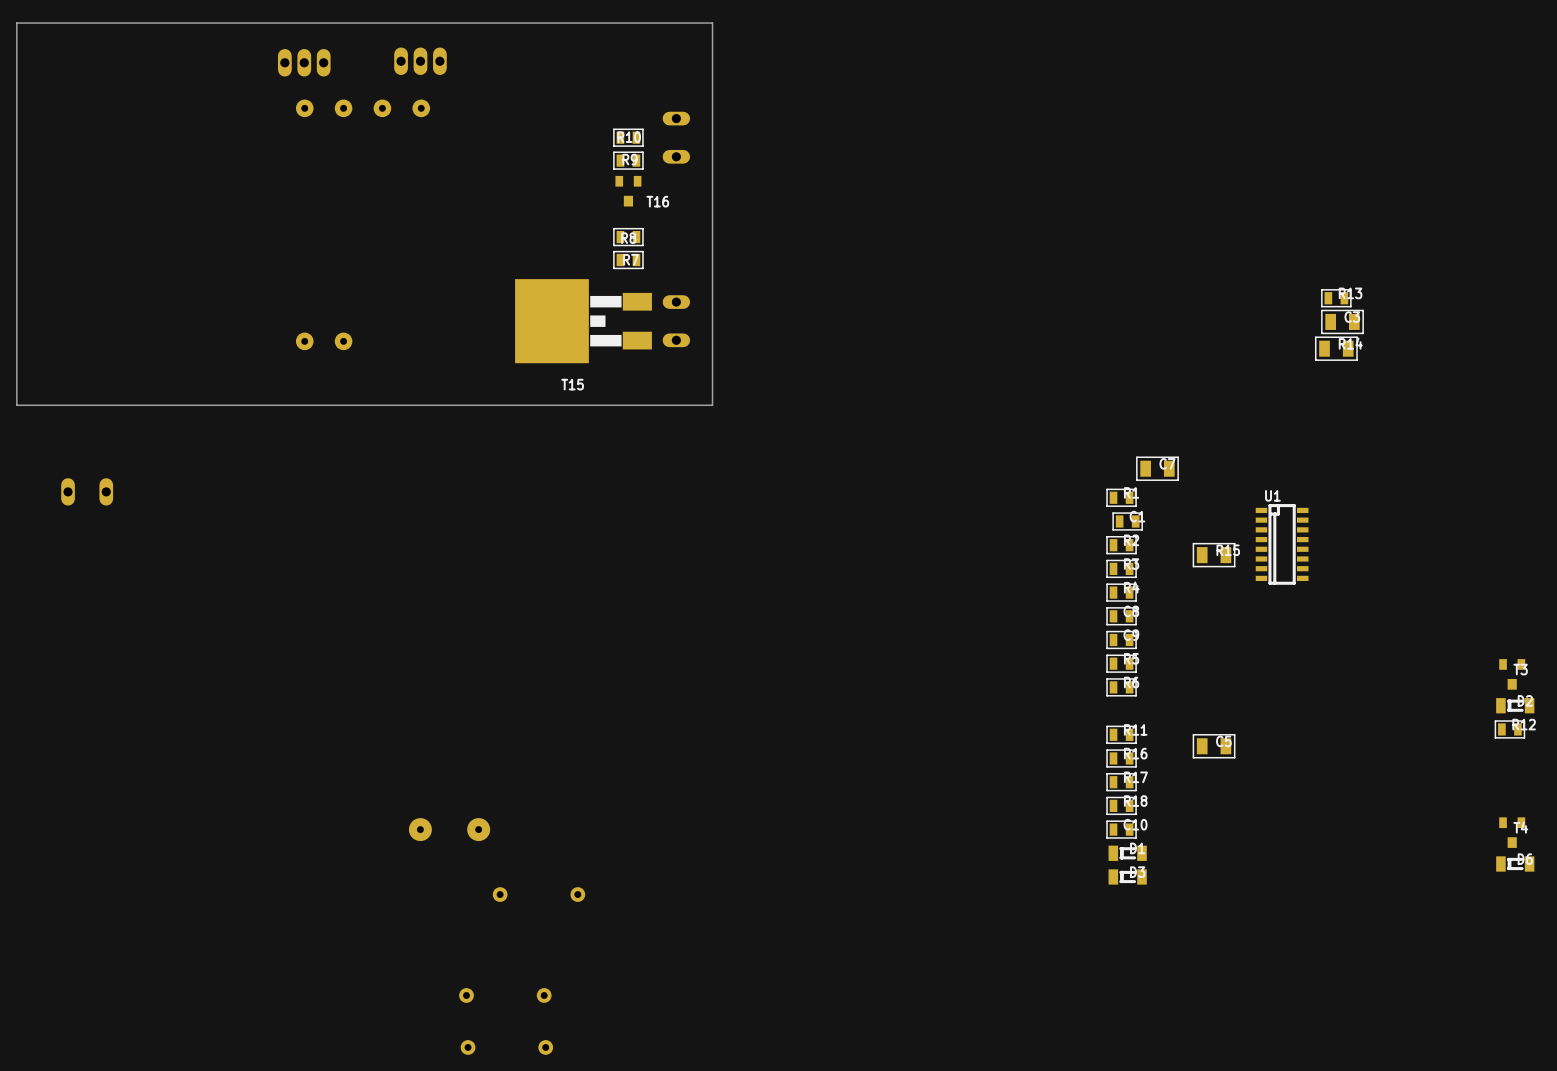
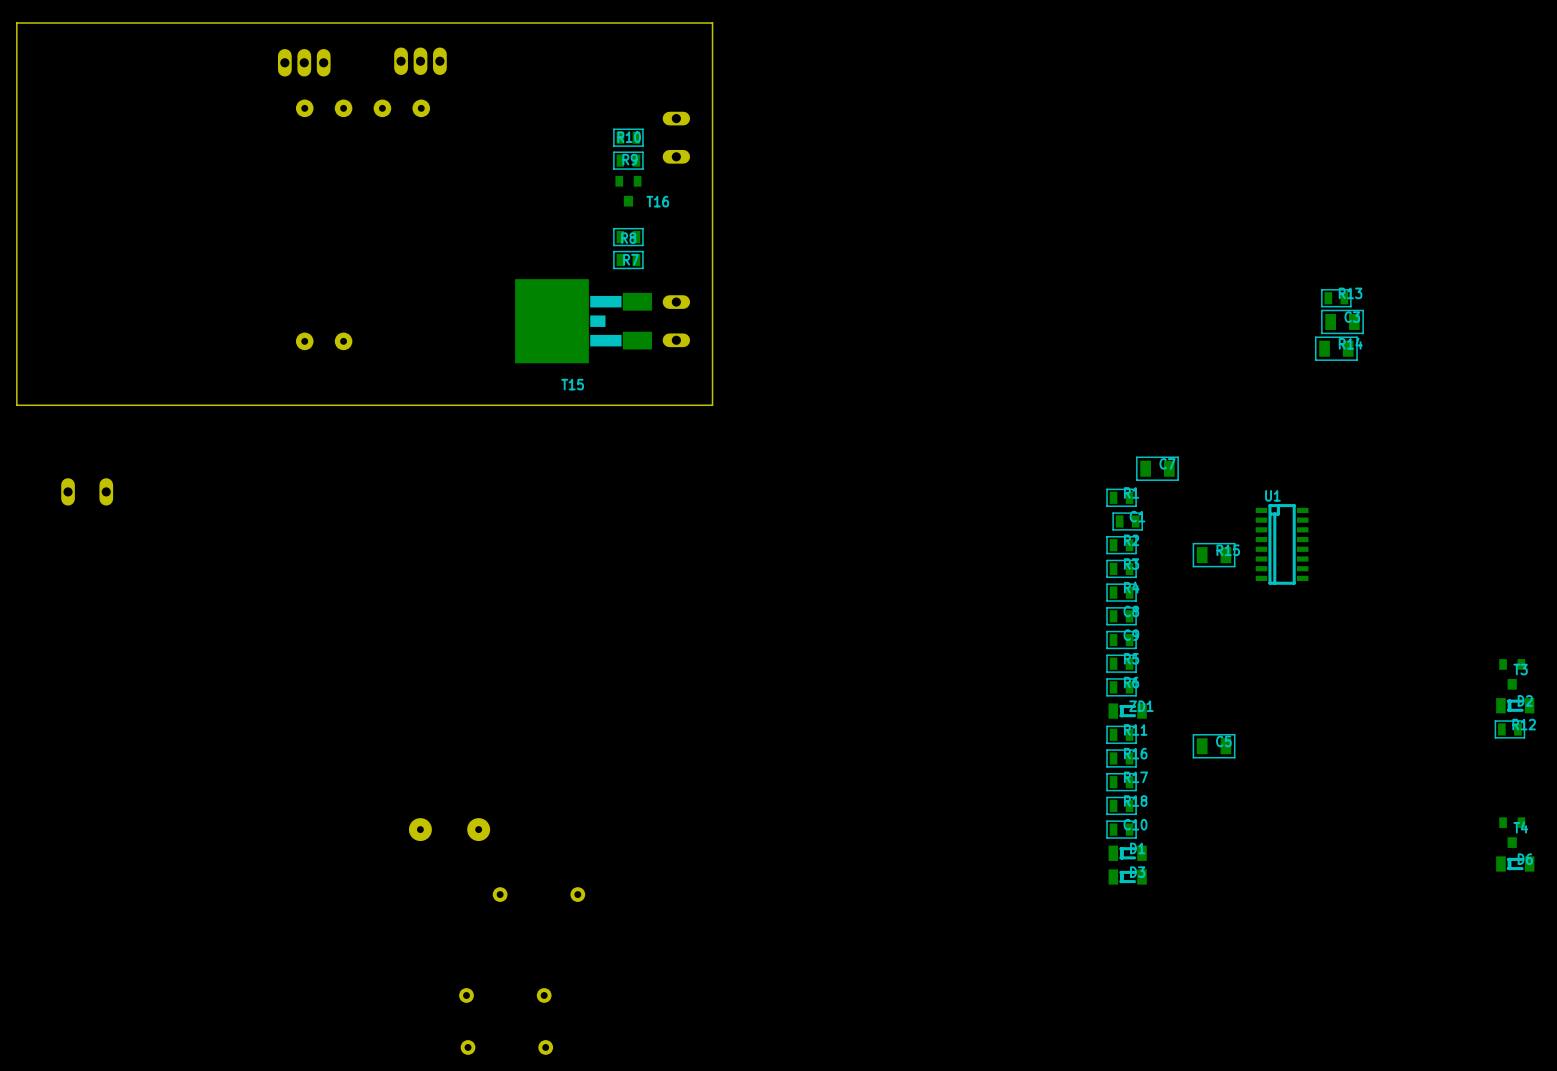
ZD1: none -> (1127, 711)

